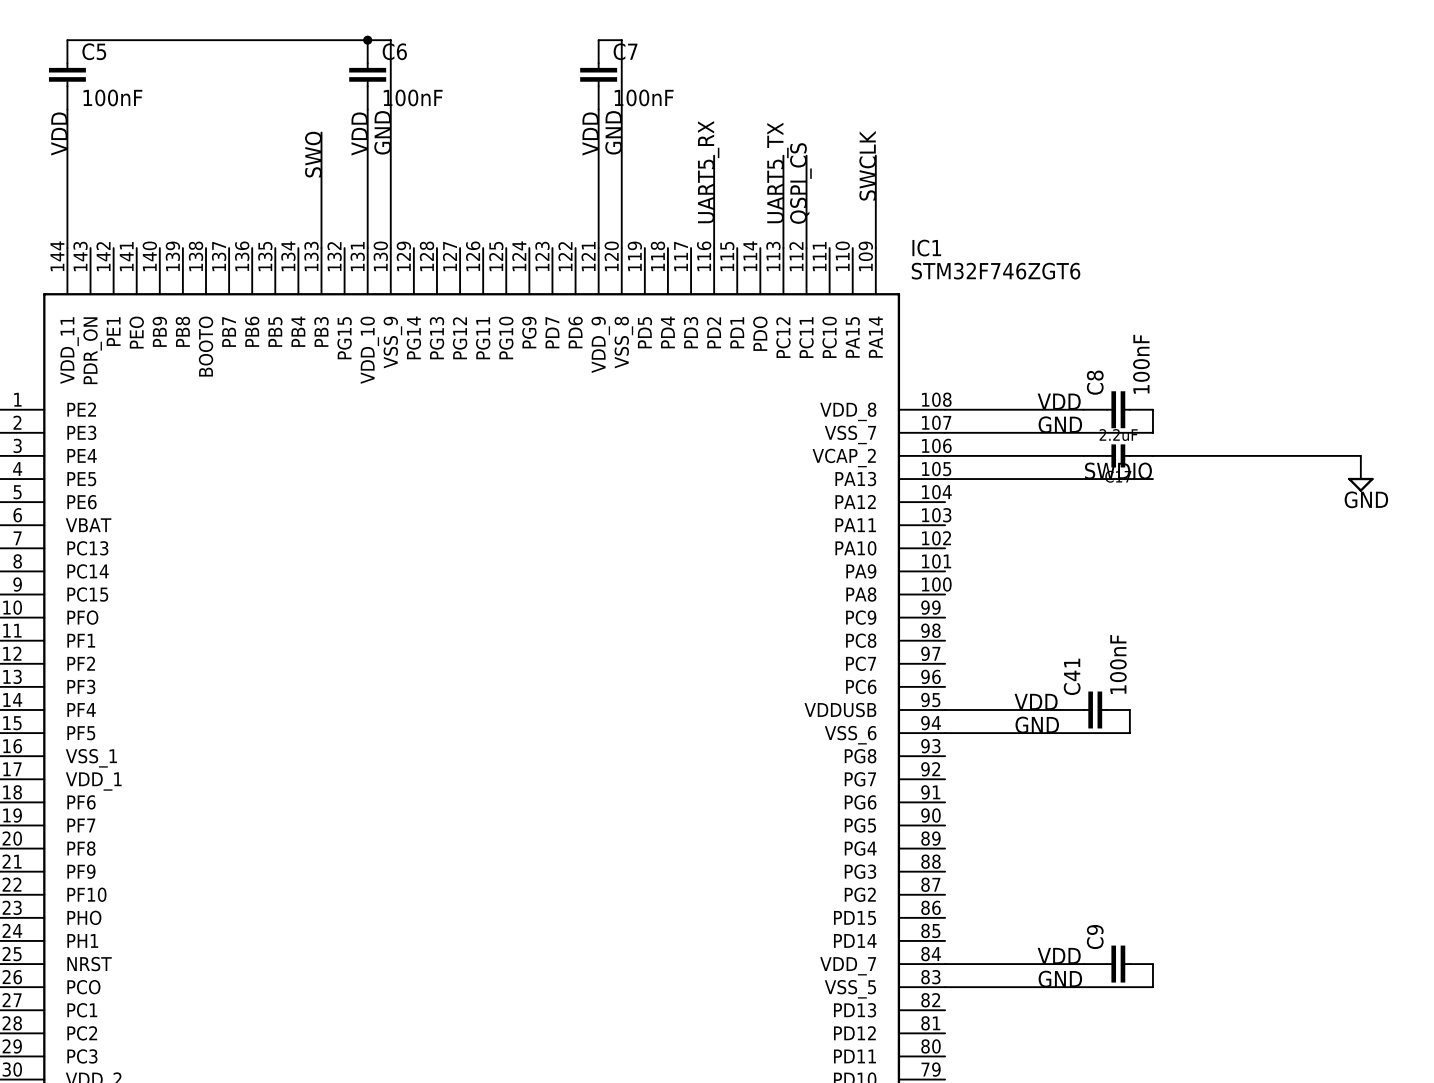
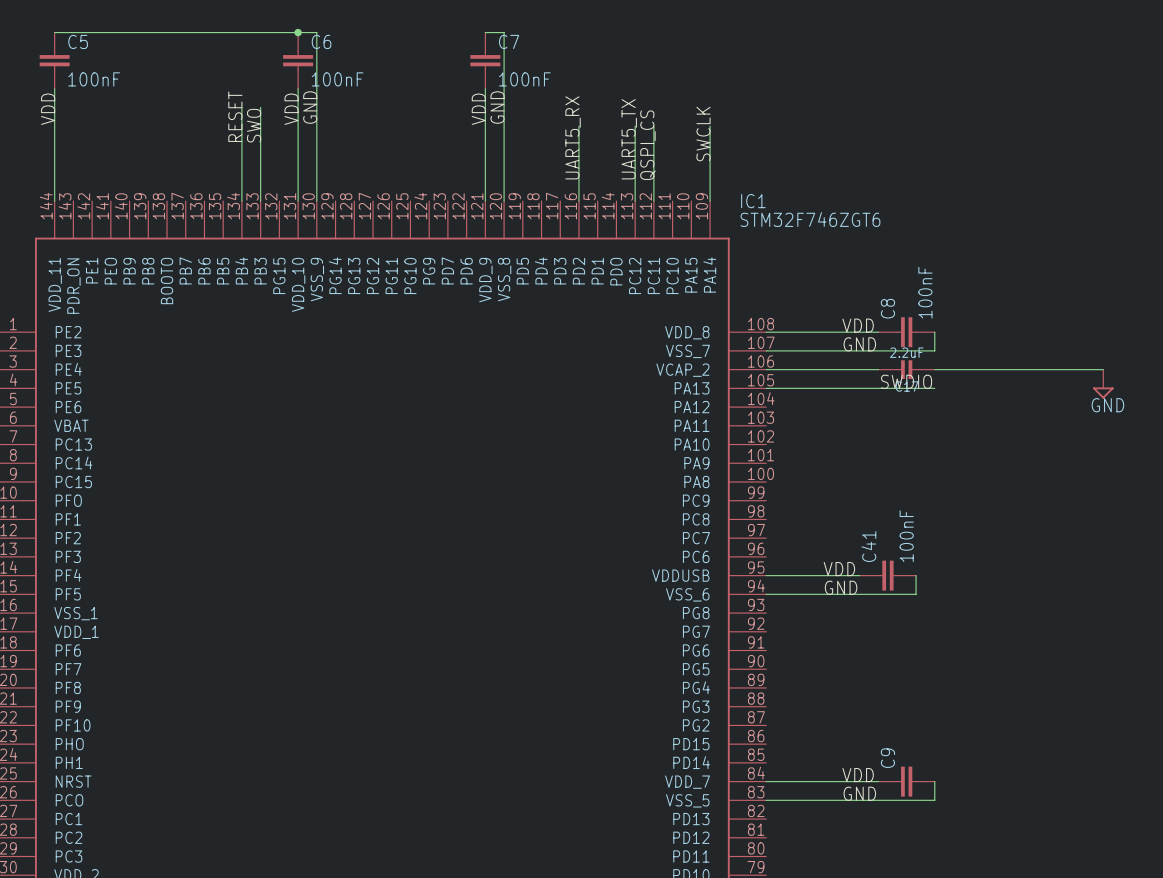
wire: none -> (241, 107) (241, 201)
label: none -> RESET (235, 116)

